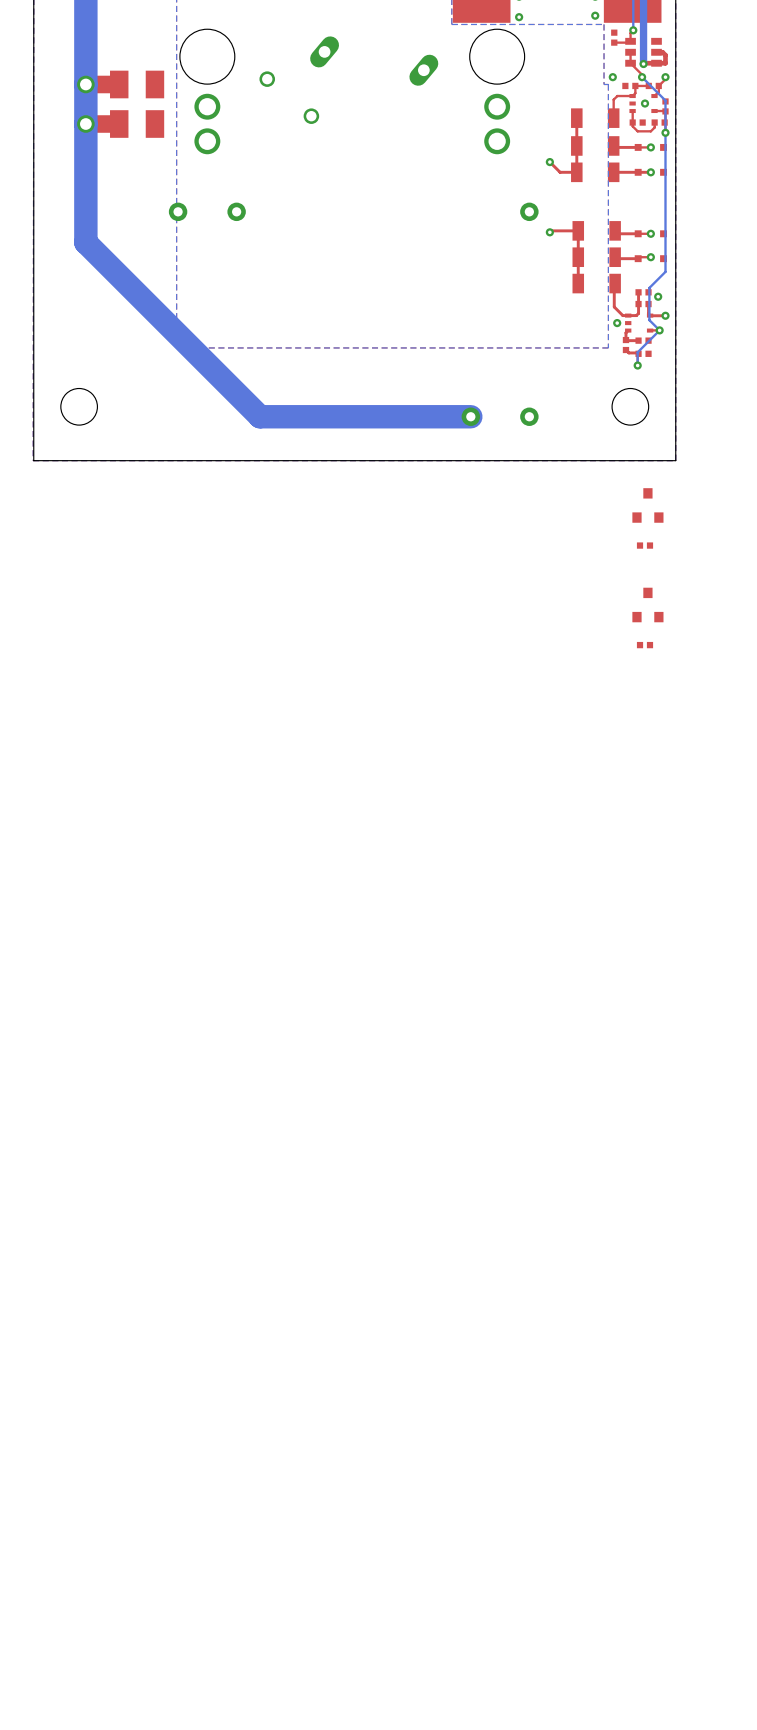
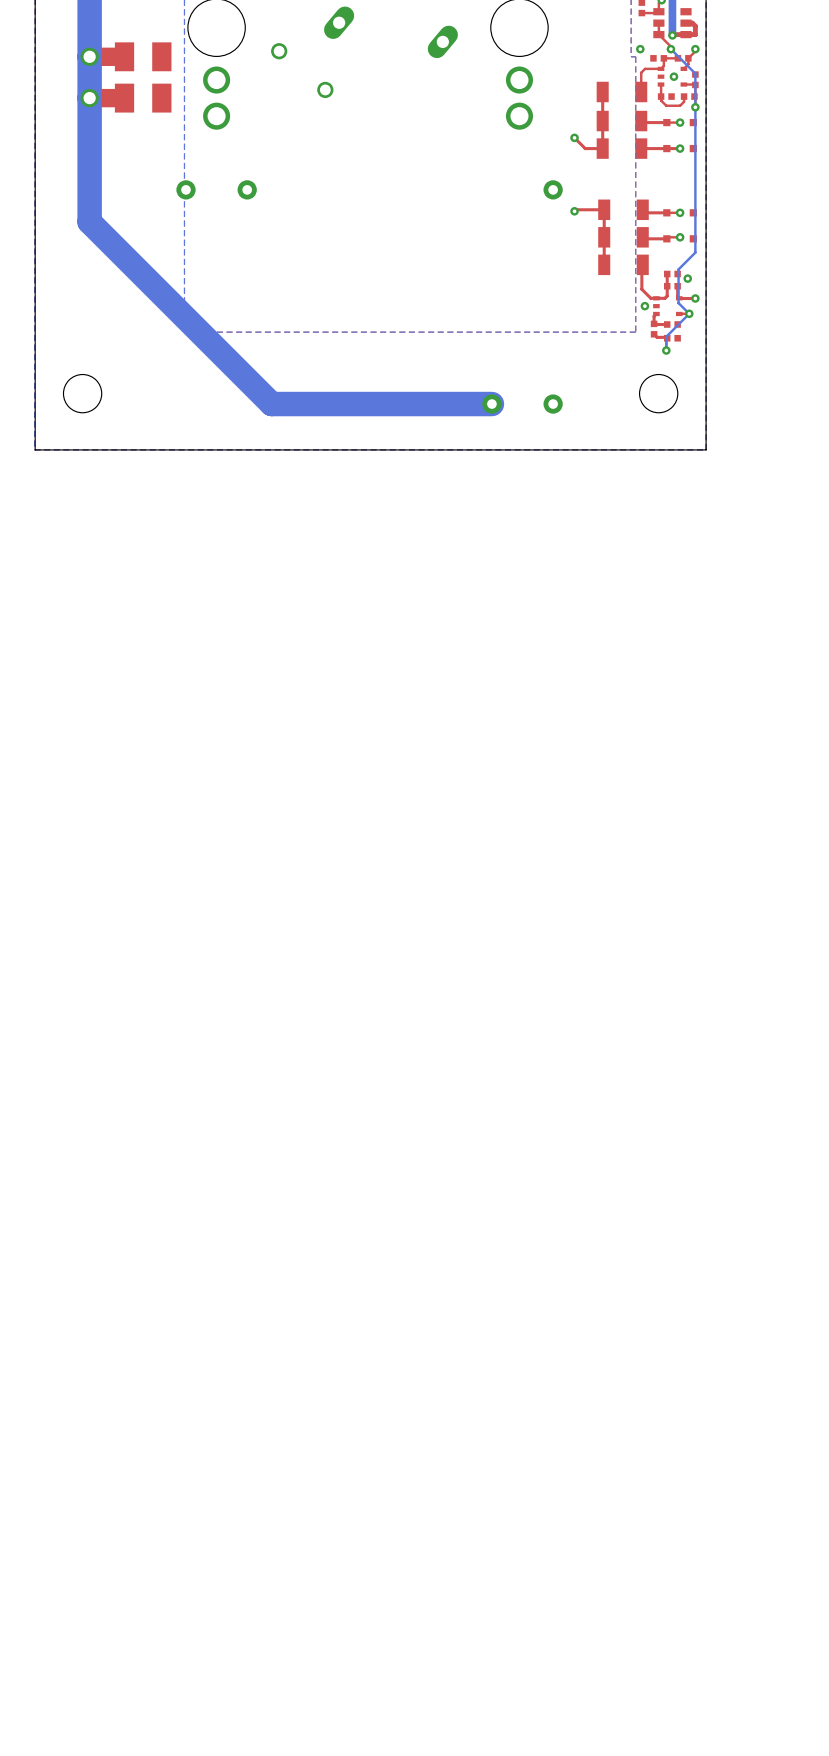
part: (647, 505) -> none
part: (645, 545) -> none
part: (647, 604) -> none
part: (645, 645) -> none

